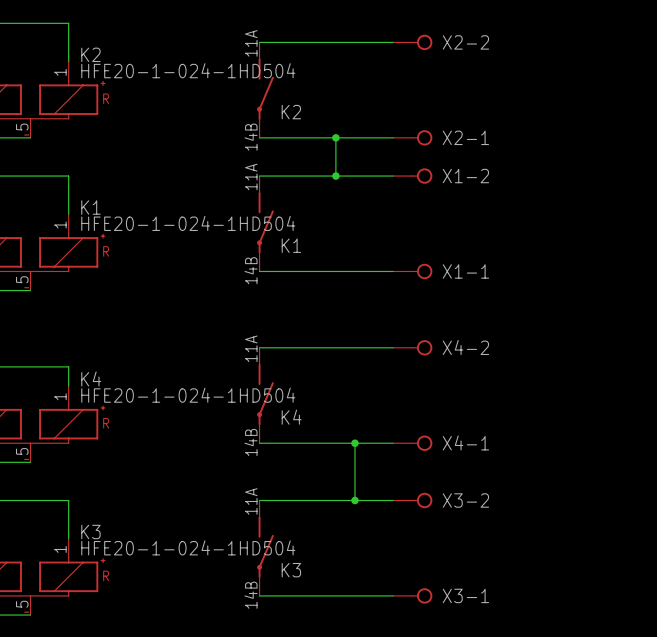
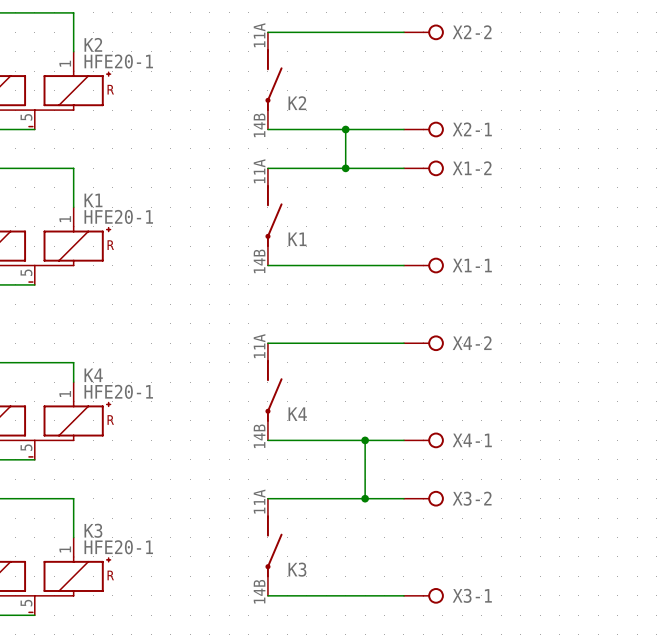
K2 value: HFE20-1-024-1HD504 (188, 70) -> HFE20-1 (118, 61)
K1 value: HFE20-1-024-1HD504 (188, 223) -> HFE20-1 (118, 216)
K4 value: HFE20-1-024-1HD504 (188, 395) -> HFE20-1 (118, 391)
K3 value: HFE20-1-024-1HD504 (188, 547) -> HFE20-1 (118, 547)

